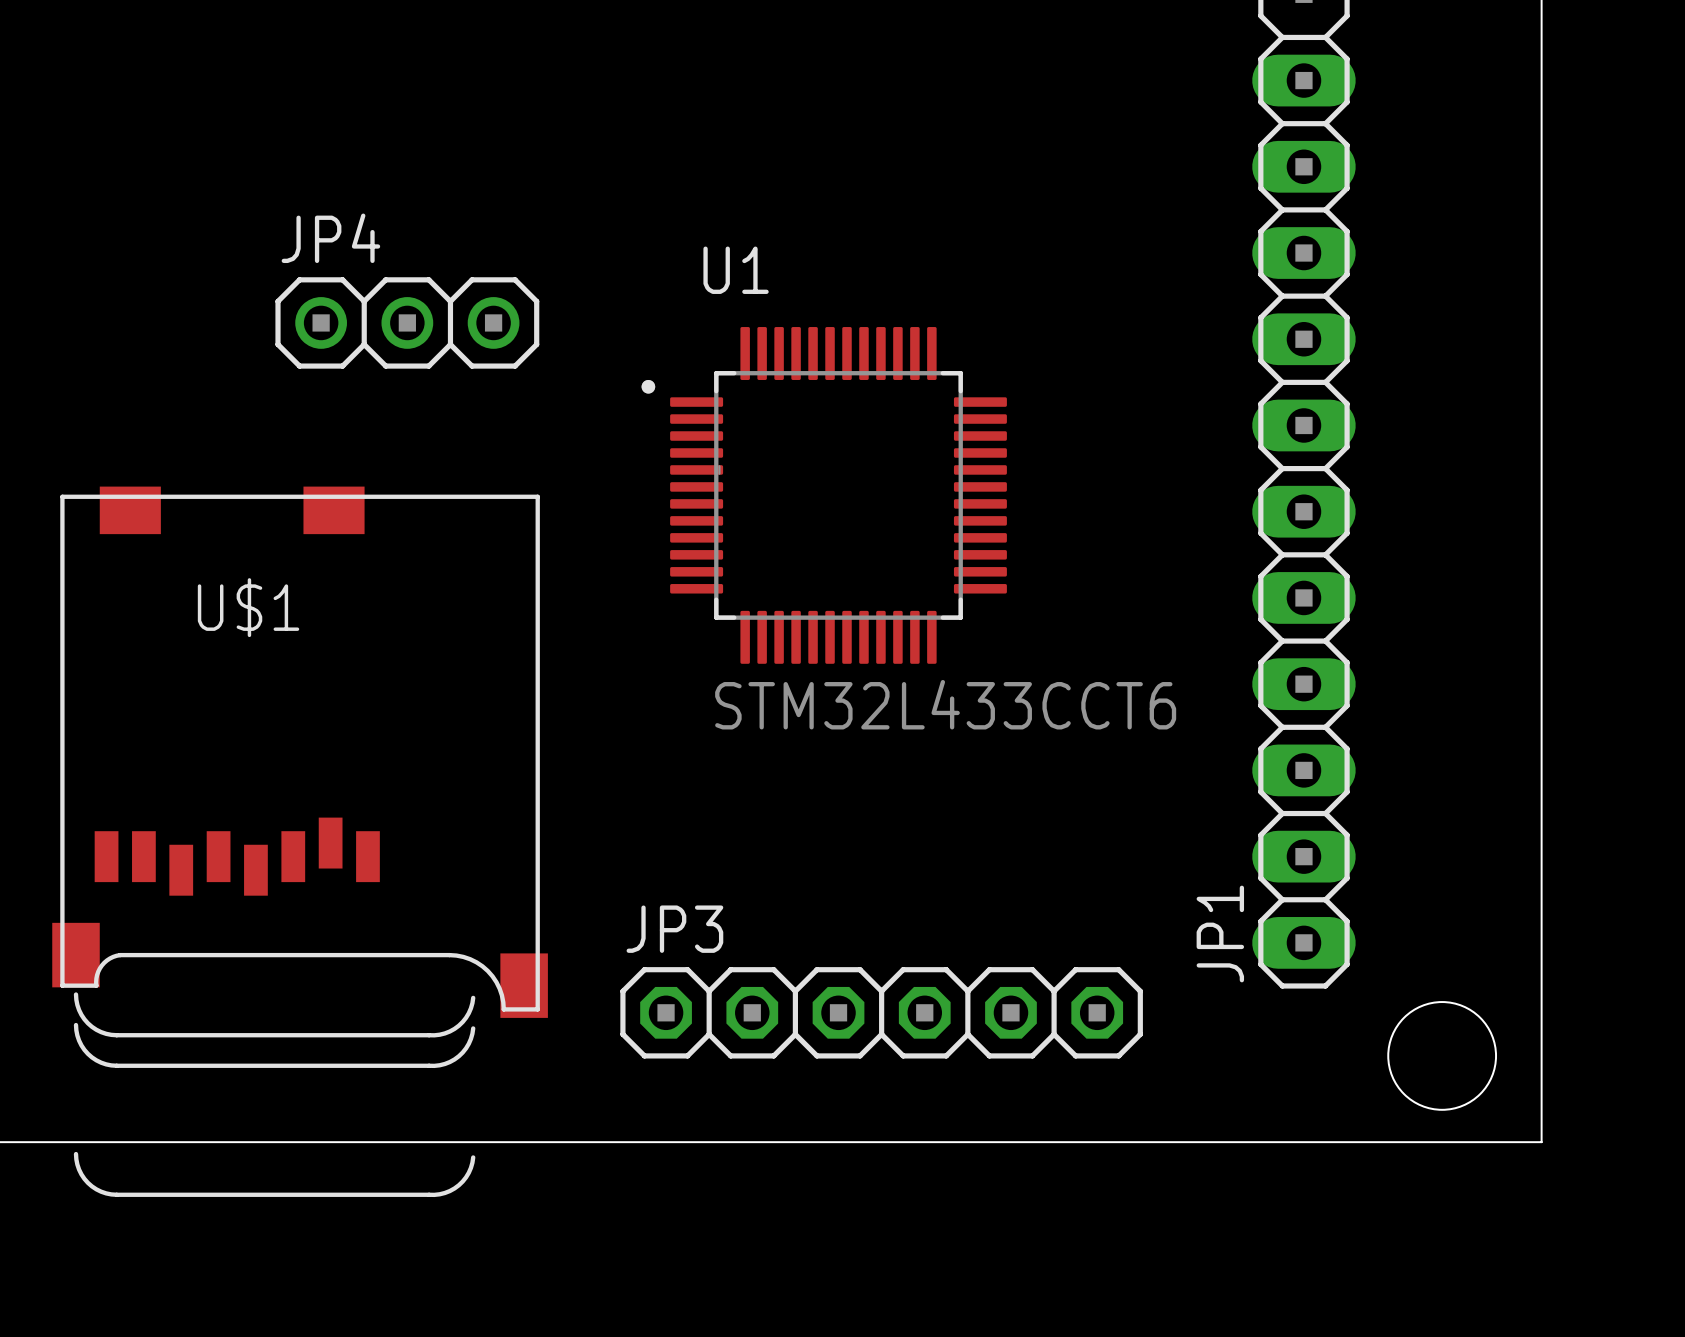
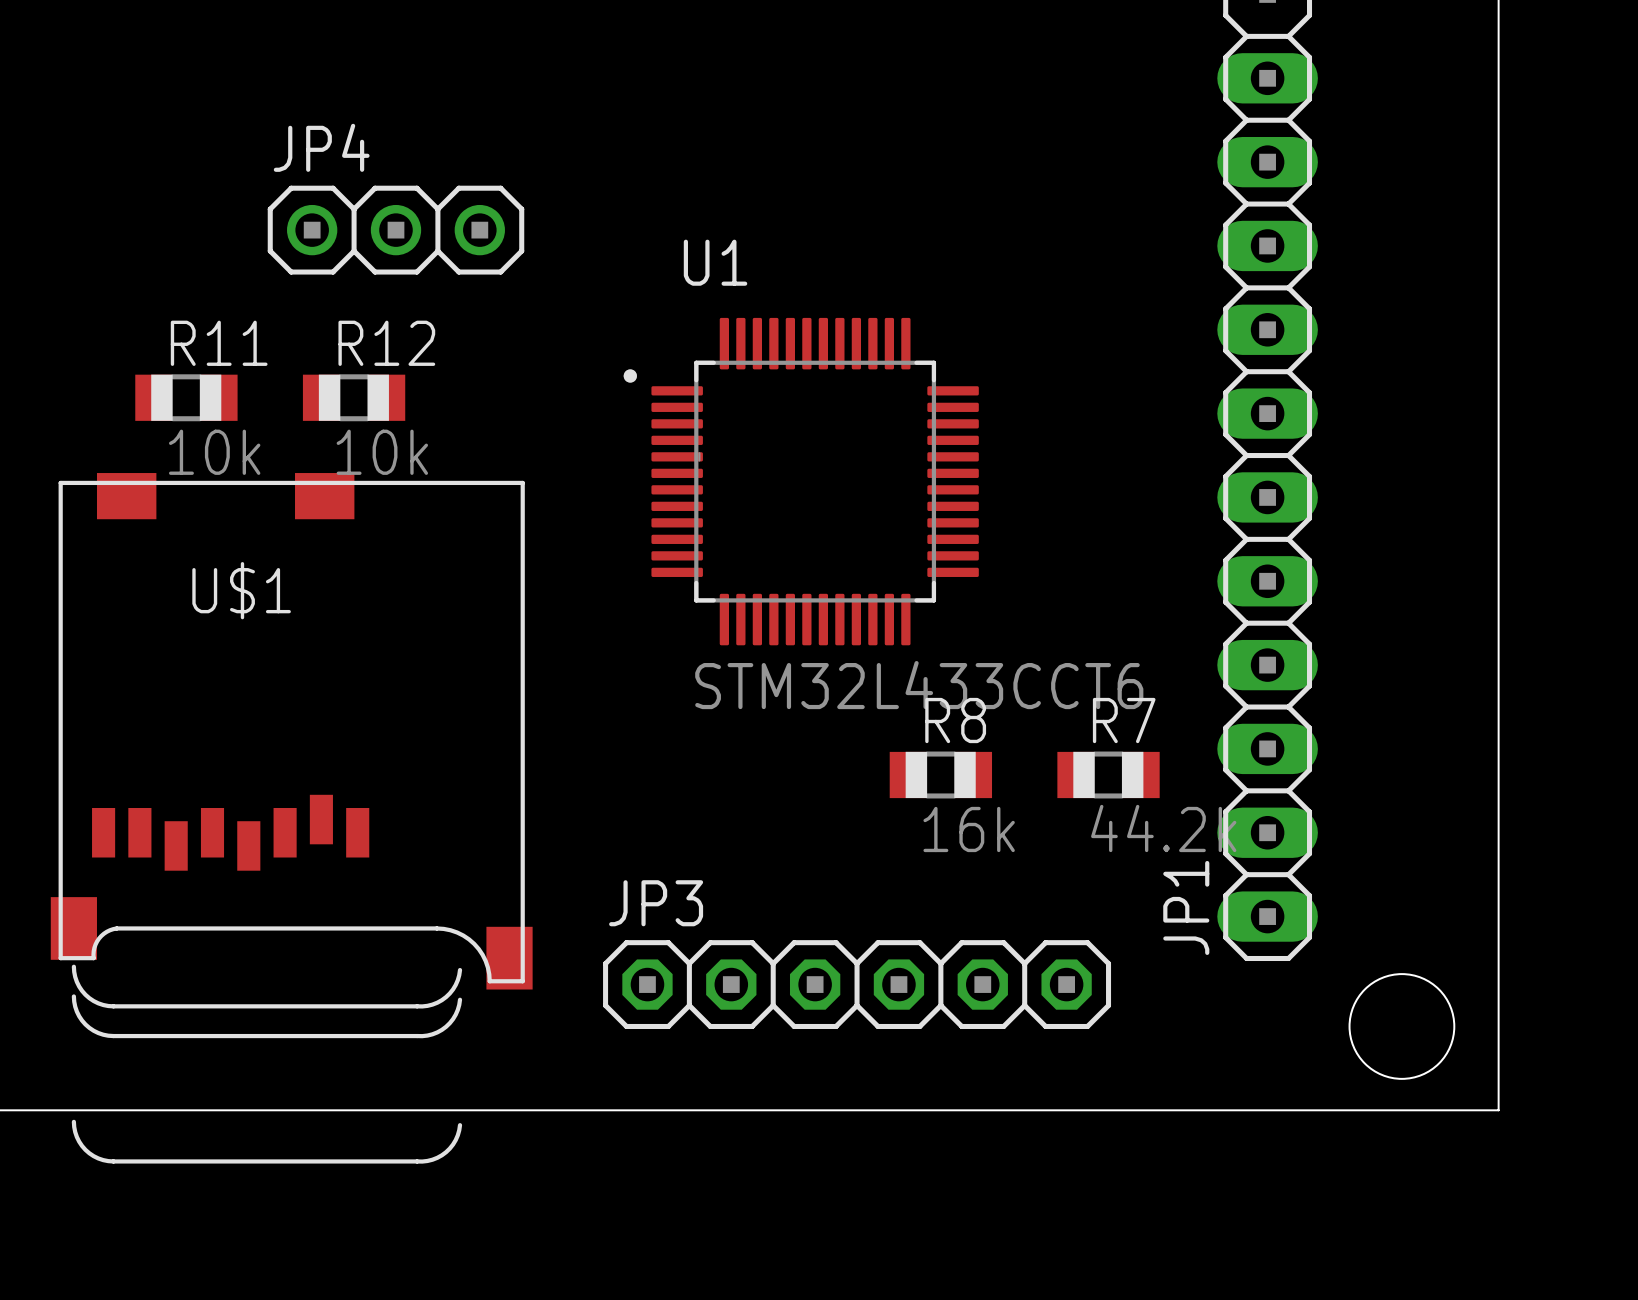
JP4 position: (407, 322) -> (395, 230)
R11: none -> 10k (186, 397)
R12: none -> 10k (354, 397)
R8: none -> 16k (940, 775)
R7: none -> 44.2k (1108, 775)

